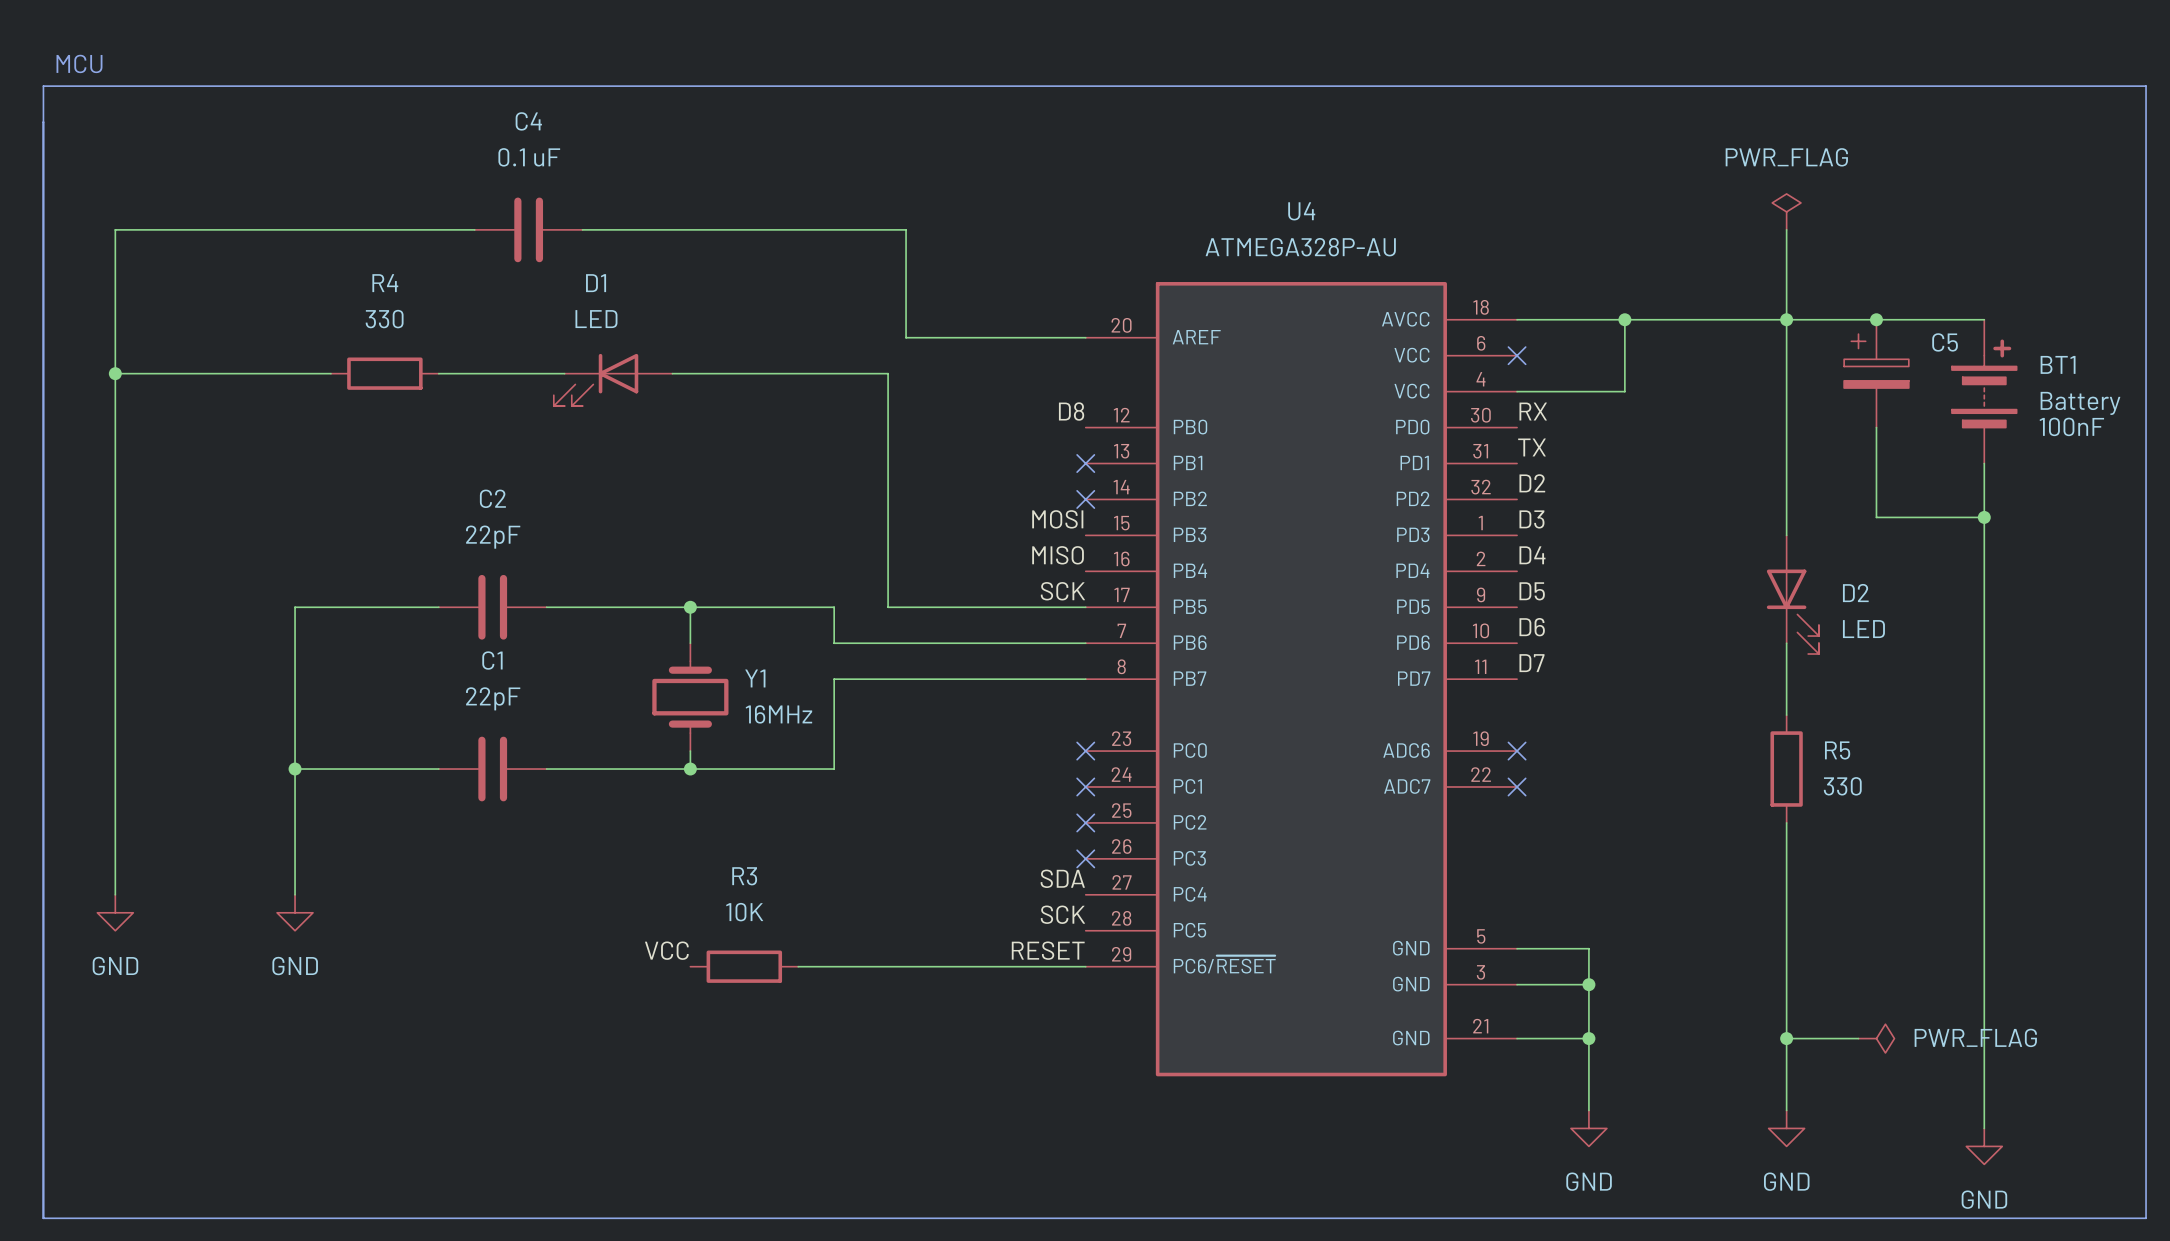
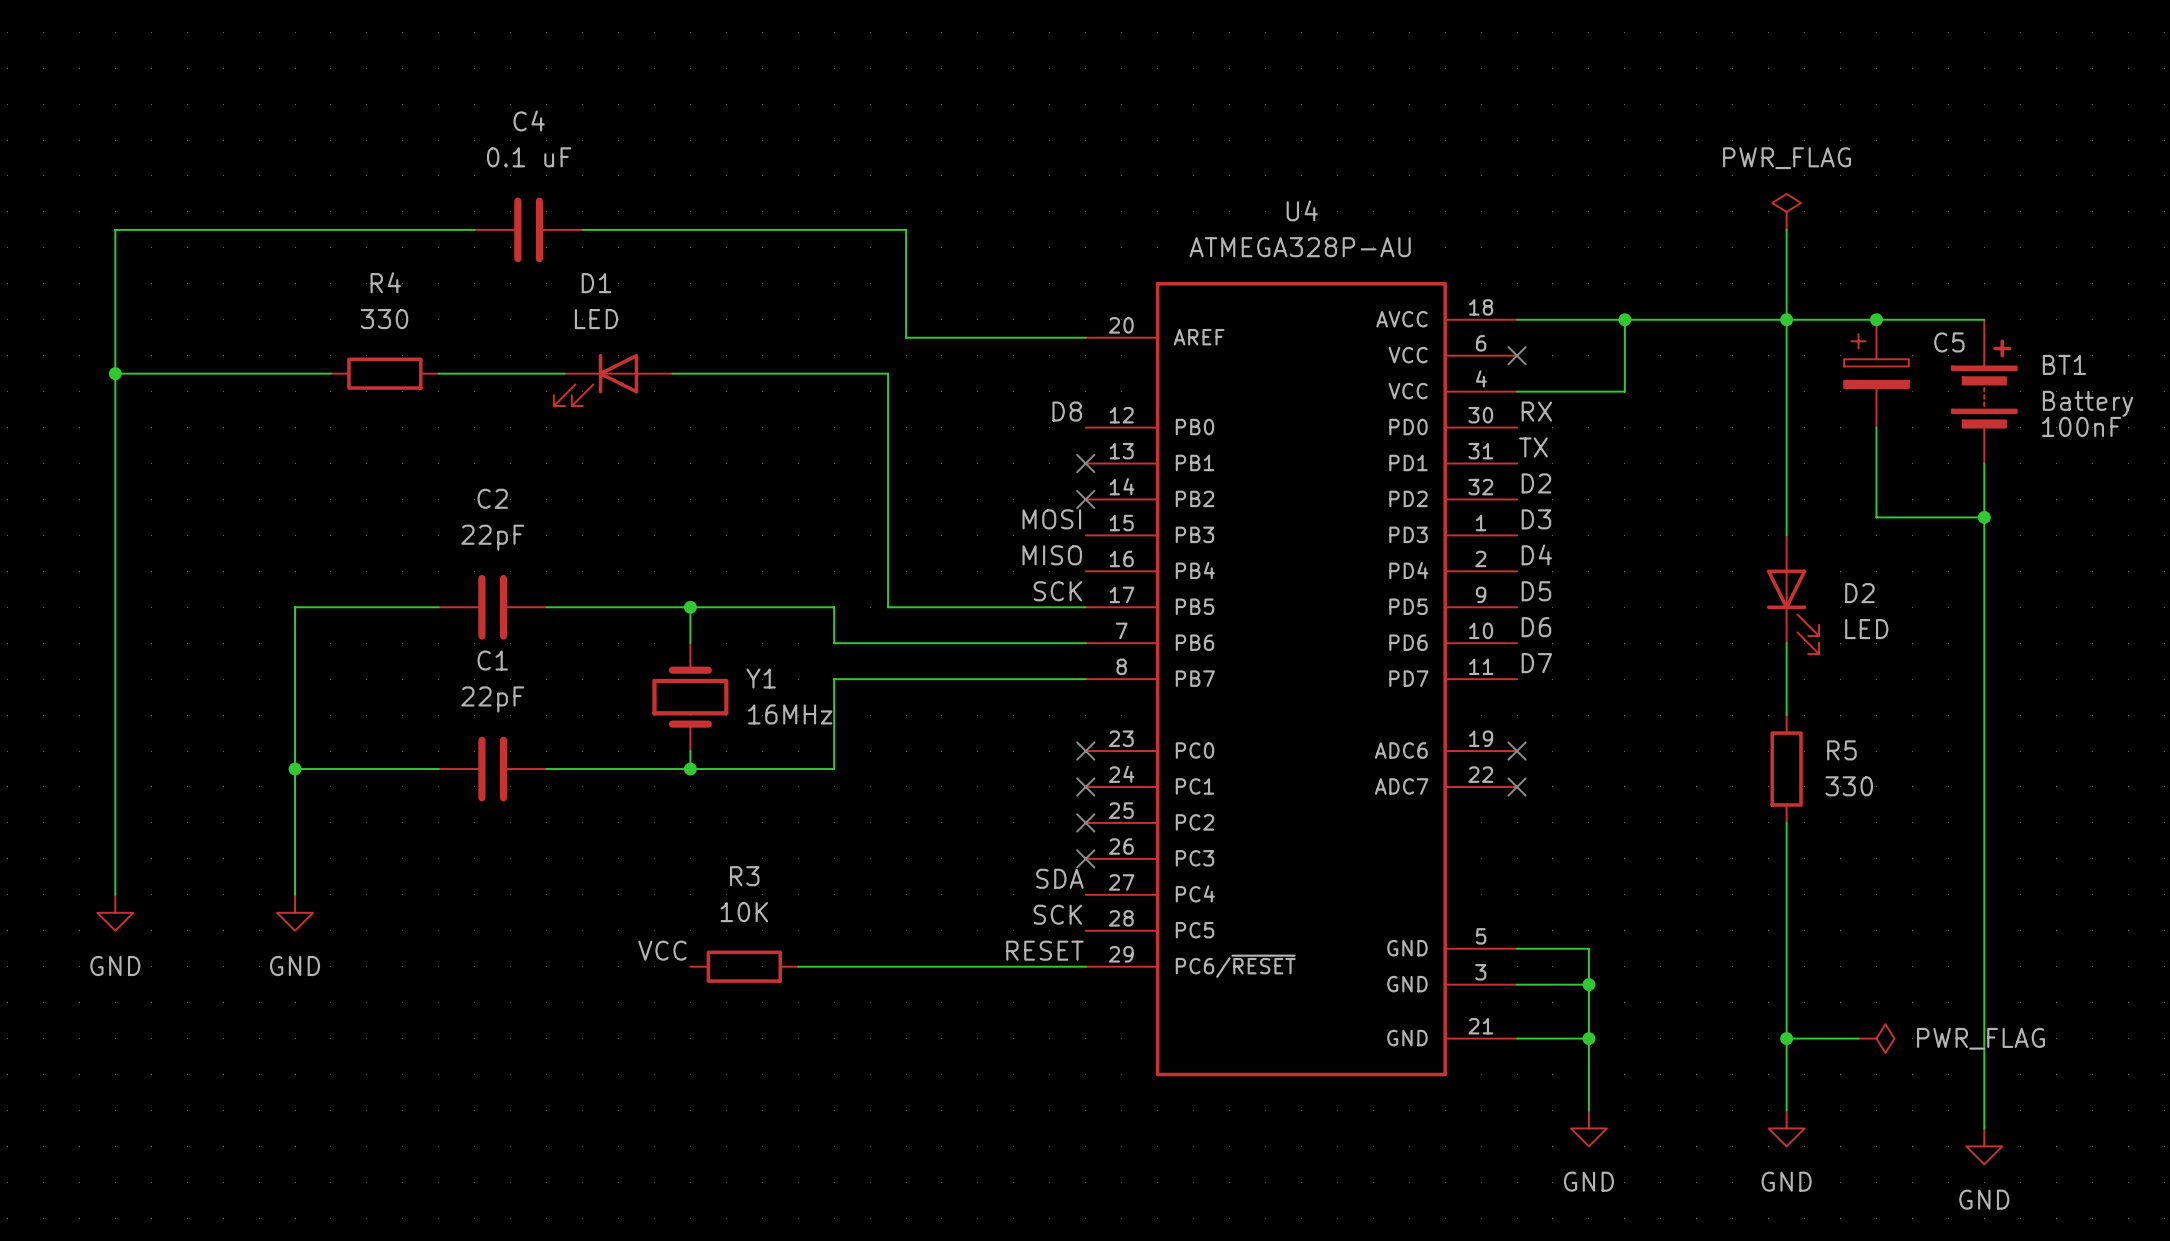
text: MCU (79, 63) -> none
line: (43, 86) (43, 1218) (2146, 1218) (2146, 86) (43, 86) -> none

